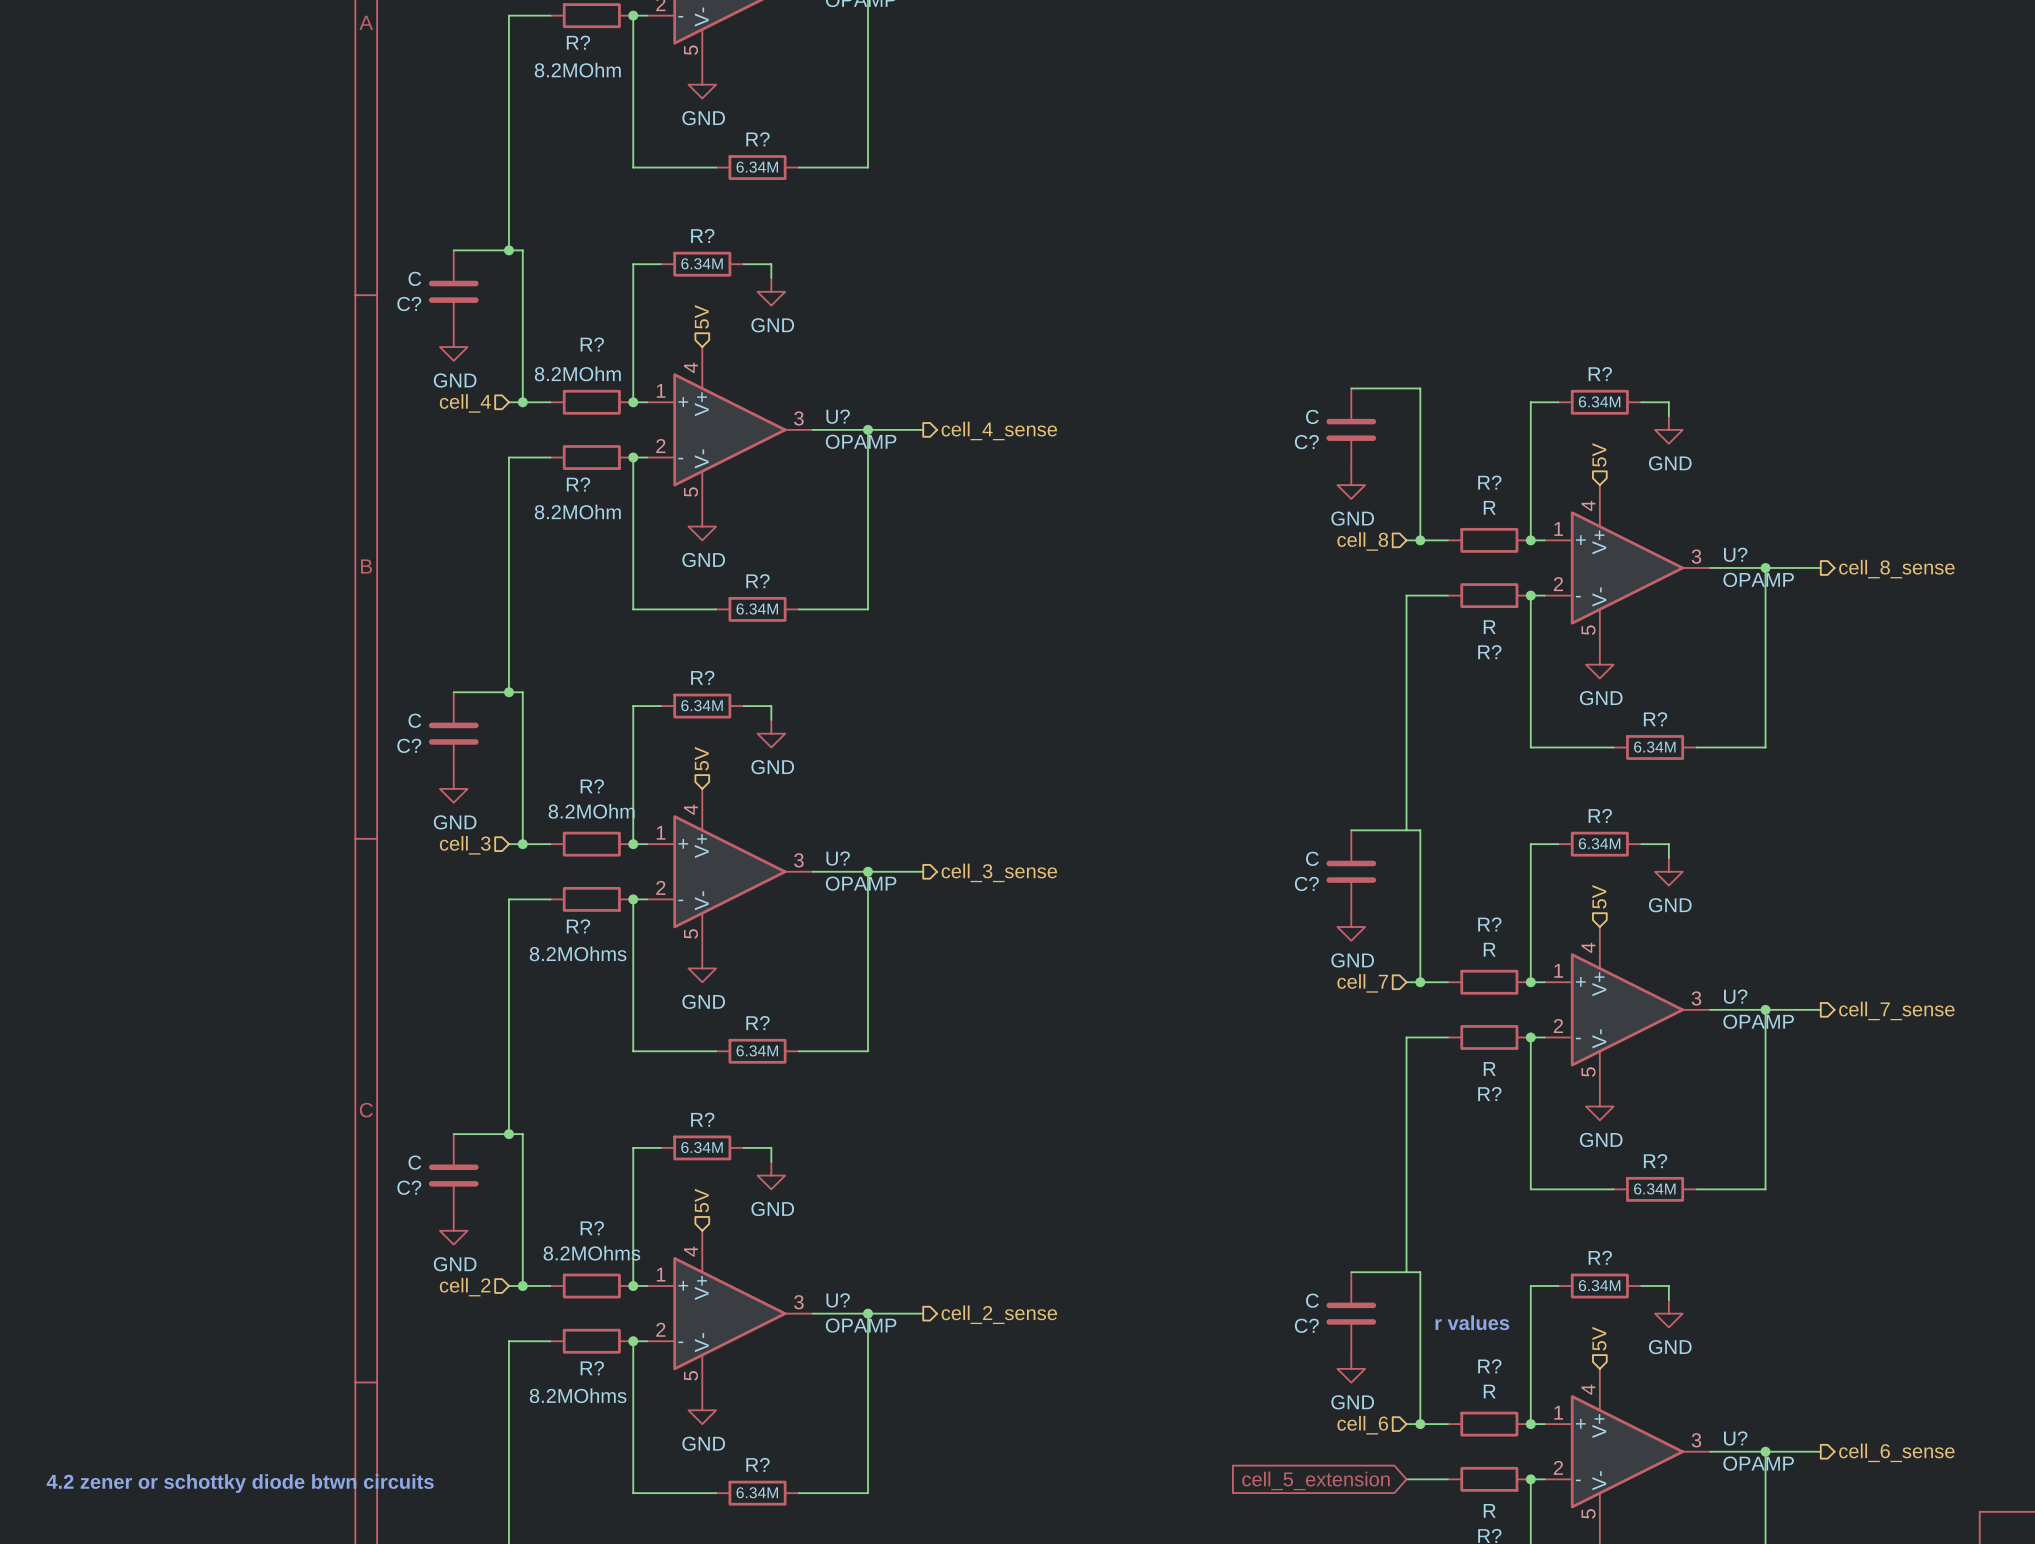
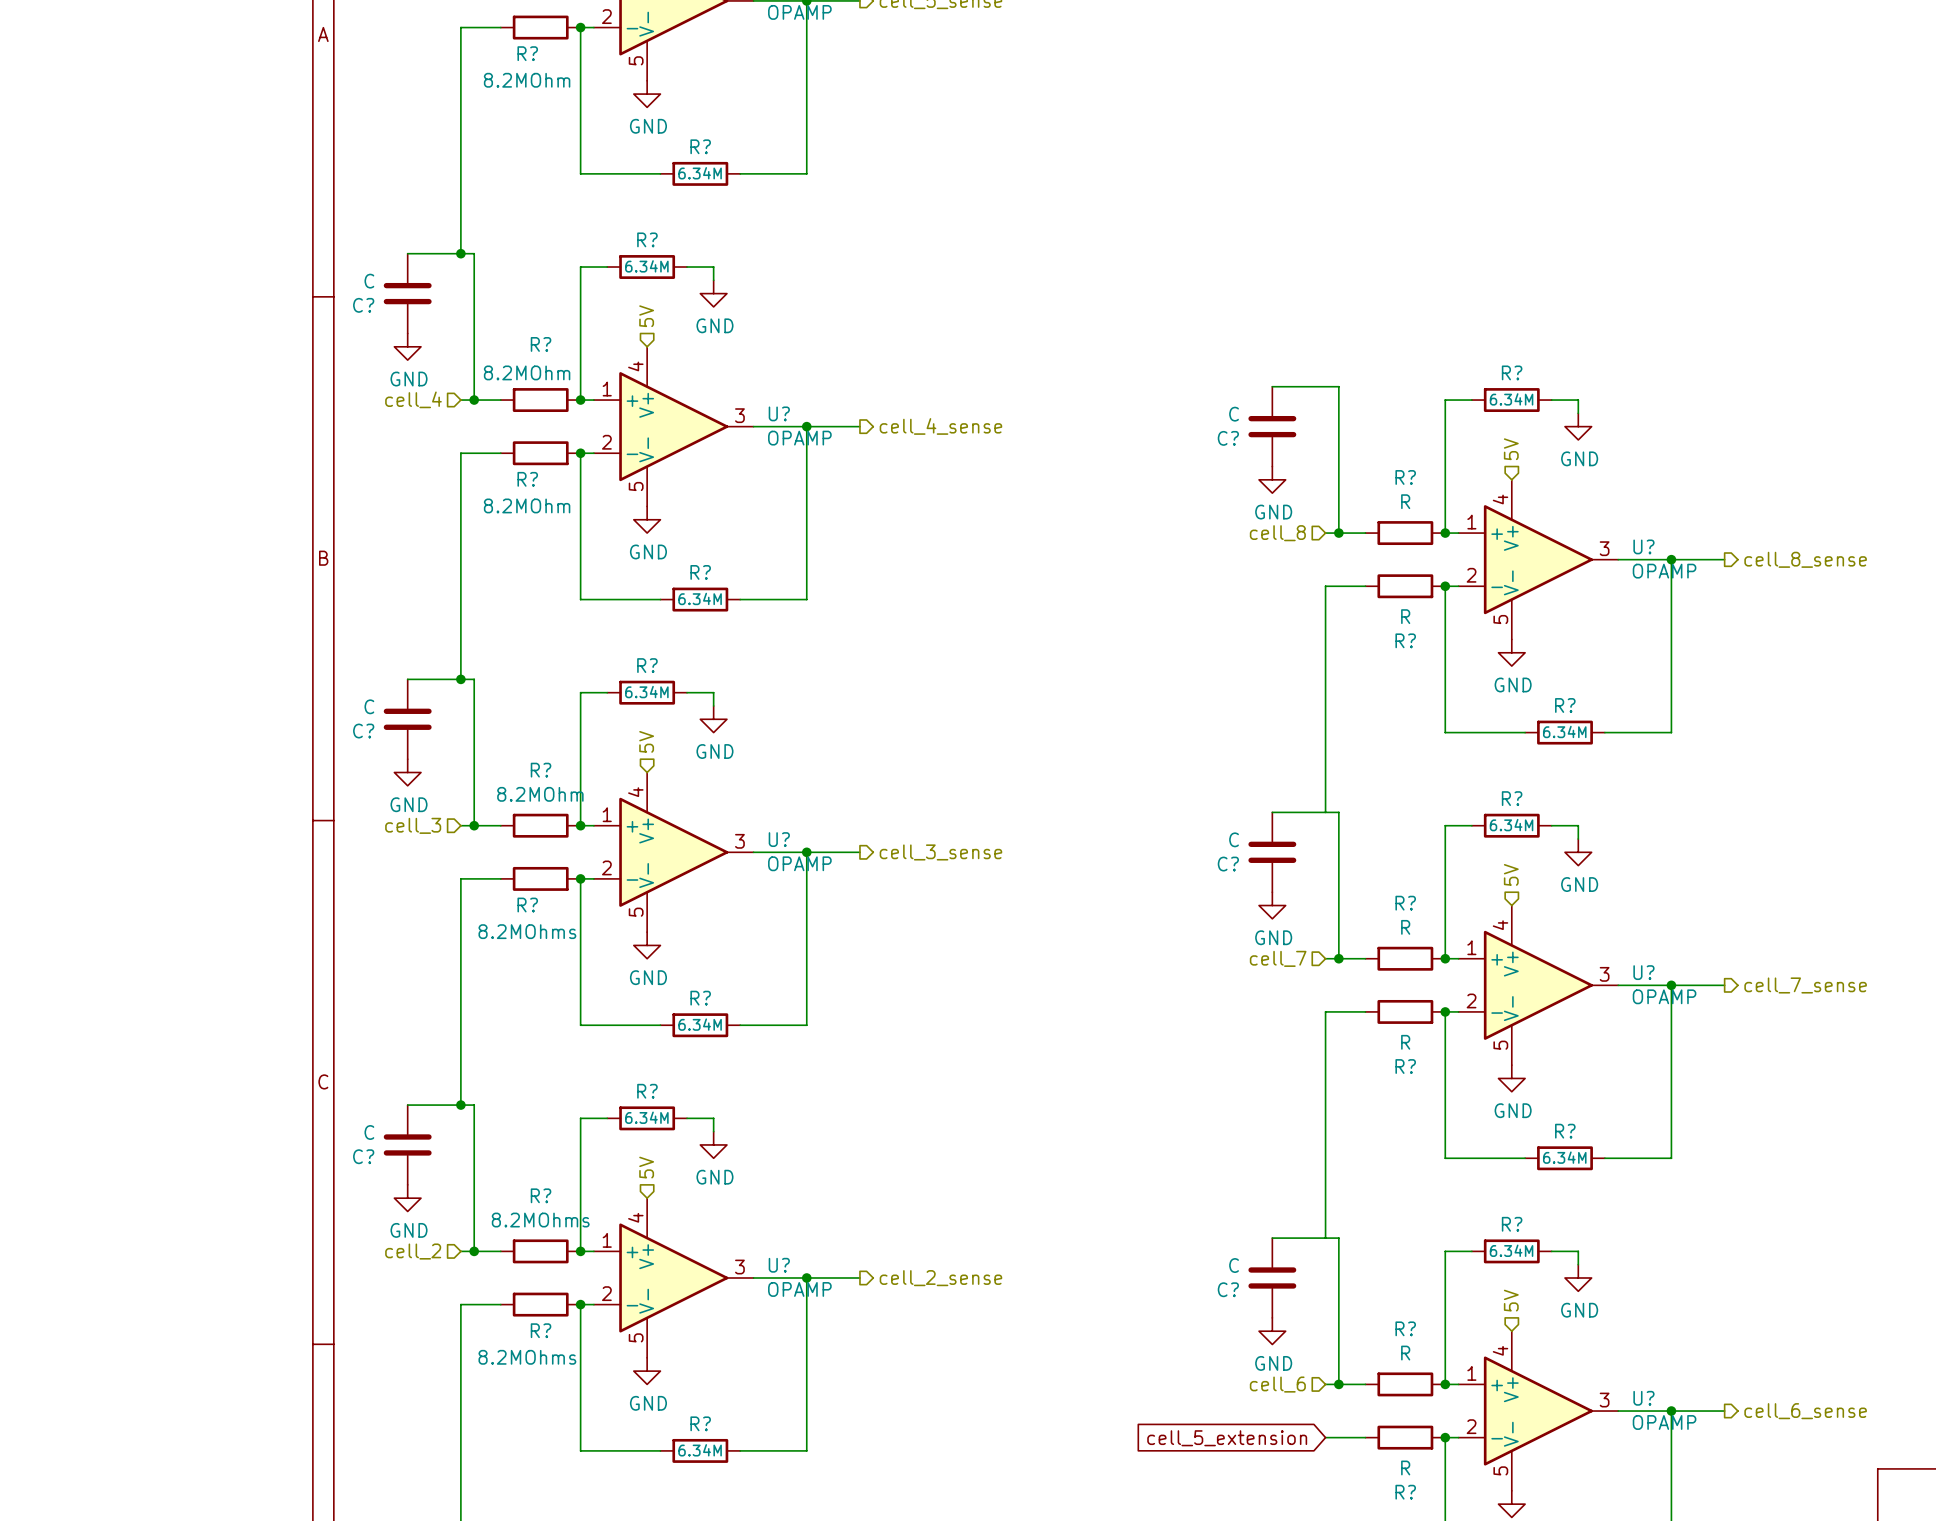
text: r values (1472, 1322) -> none
text: 4.2 zener or schottky diode btwn circuits (240, 1483) -> none

